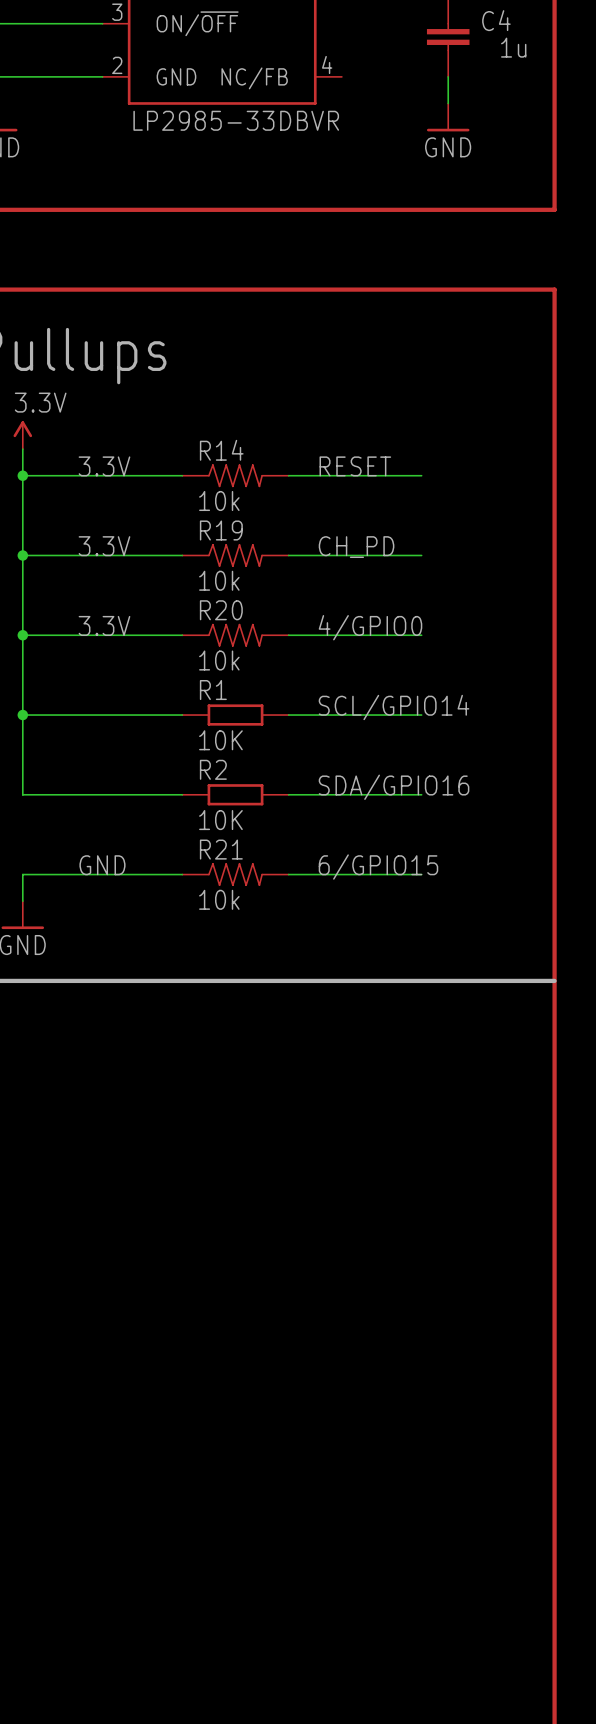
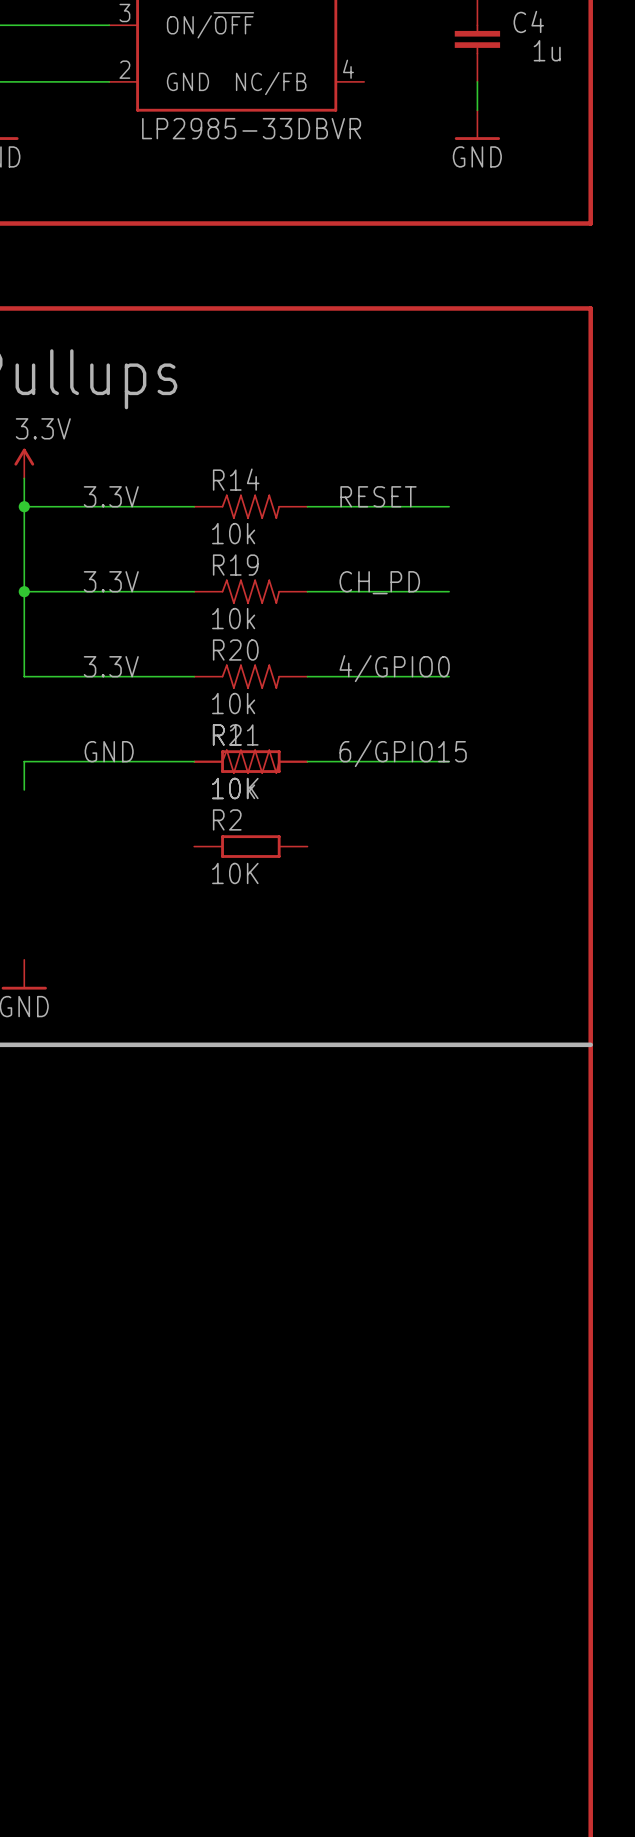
wire: (22, 635) (22, 715) -> none
junction: (22, 635) -> none
label: SCL/GPIO14 (394, 707) -> 6/GPIO15 (403, 753)
junction: (22, 715) -> none
wire: (22, 741) (22, 794) (182, 794) -> none
label: SDA/GPIO16 (394, 787) -> none
wire: (288, 794) (421, 794) -> none
label position: GND (102, 865) -> GND (109, 751)
label: 6/GPIO15 (378, 867) -> none
wire: (182, 874) (22, 874) (22, 901) -> none
R21 position: (235, 874) -> (250, 761)
wire: (288, 874) (421, 874) -> none

